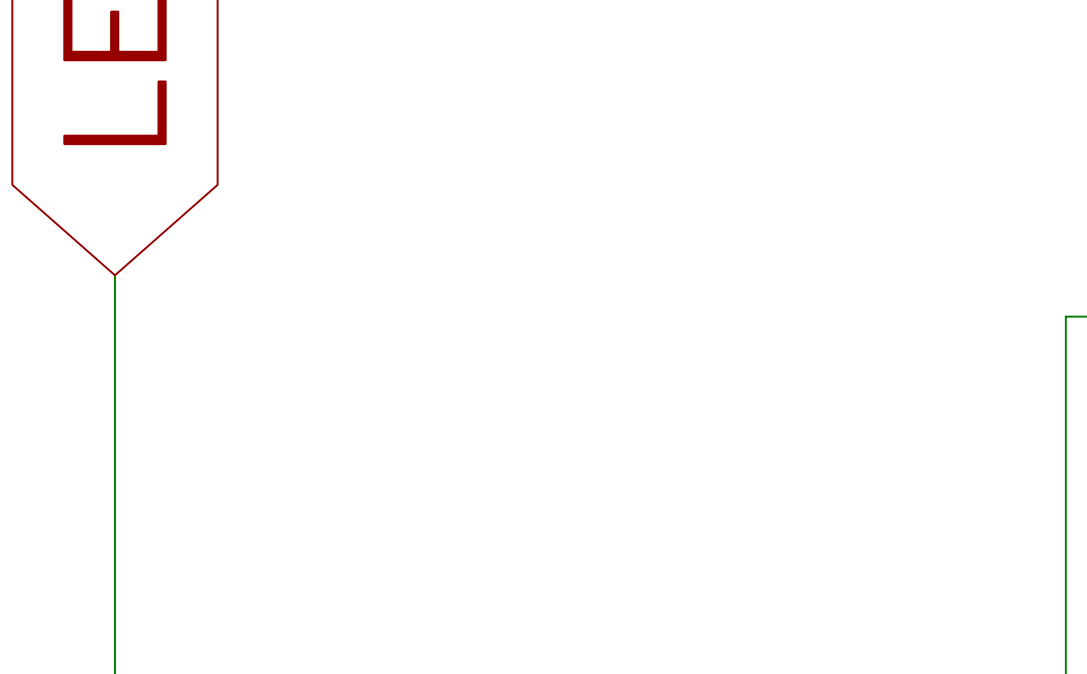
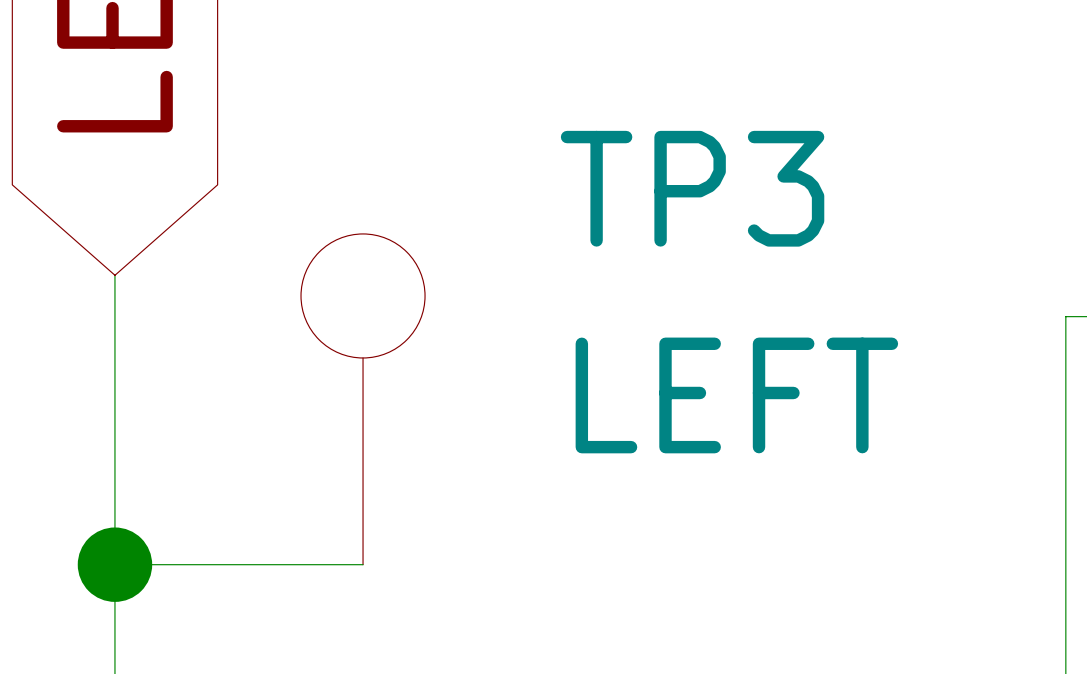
TP3: none -> LEFT (363, 399)
wire: none -> (114, 564) (363, 564)
junction: none -> (114, 564)

